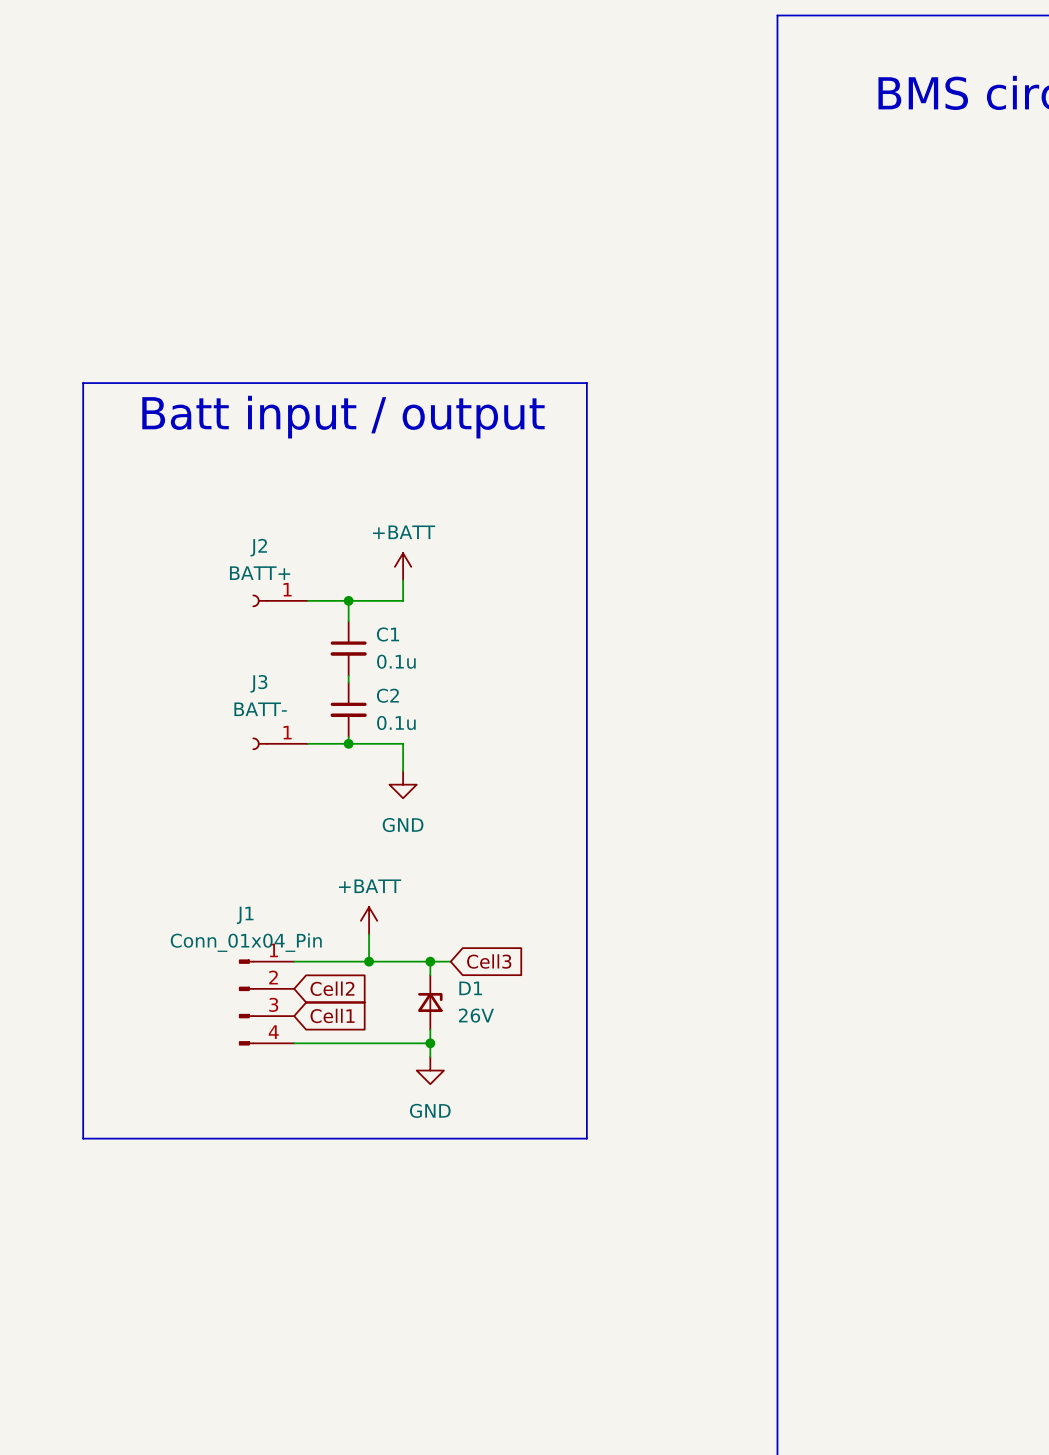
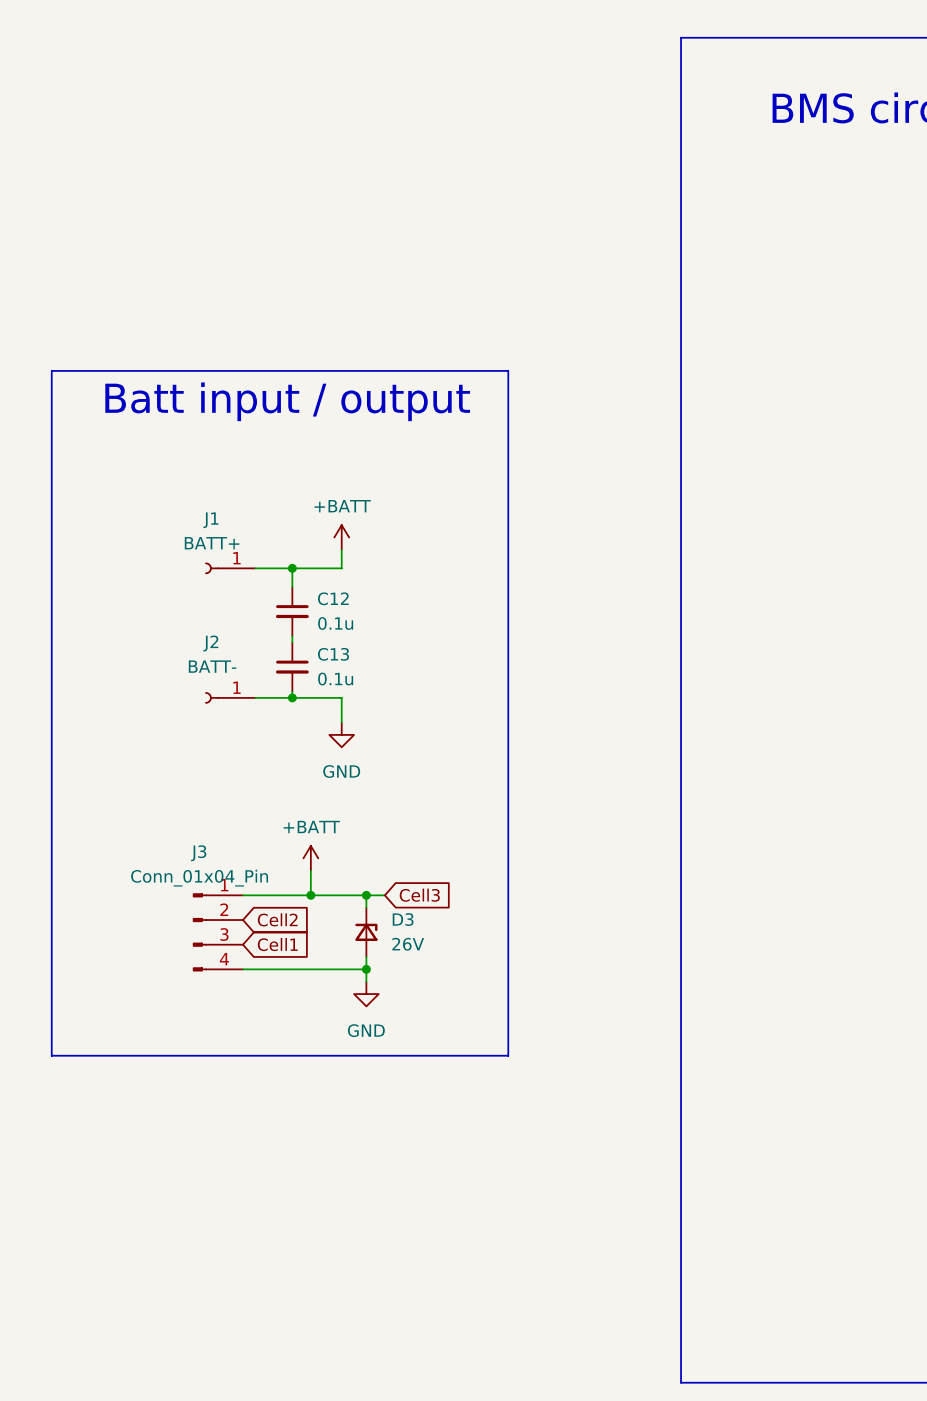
J2 name: J2 (258, 547) -> J1 (210, 520)
C1 name: C1 (387, 634) -> C12 (333, 598)
J3 name: J3 (258, 683) -> J2 (210, 643)
C2 name: C2 (387, 695) -> C13 (333, 654)
J1 name: J1 (245, 915) -> J3 (198, 853)
D1 name: D1 (470, 988) -> D3 (403, 919)

